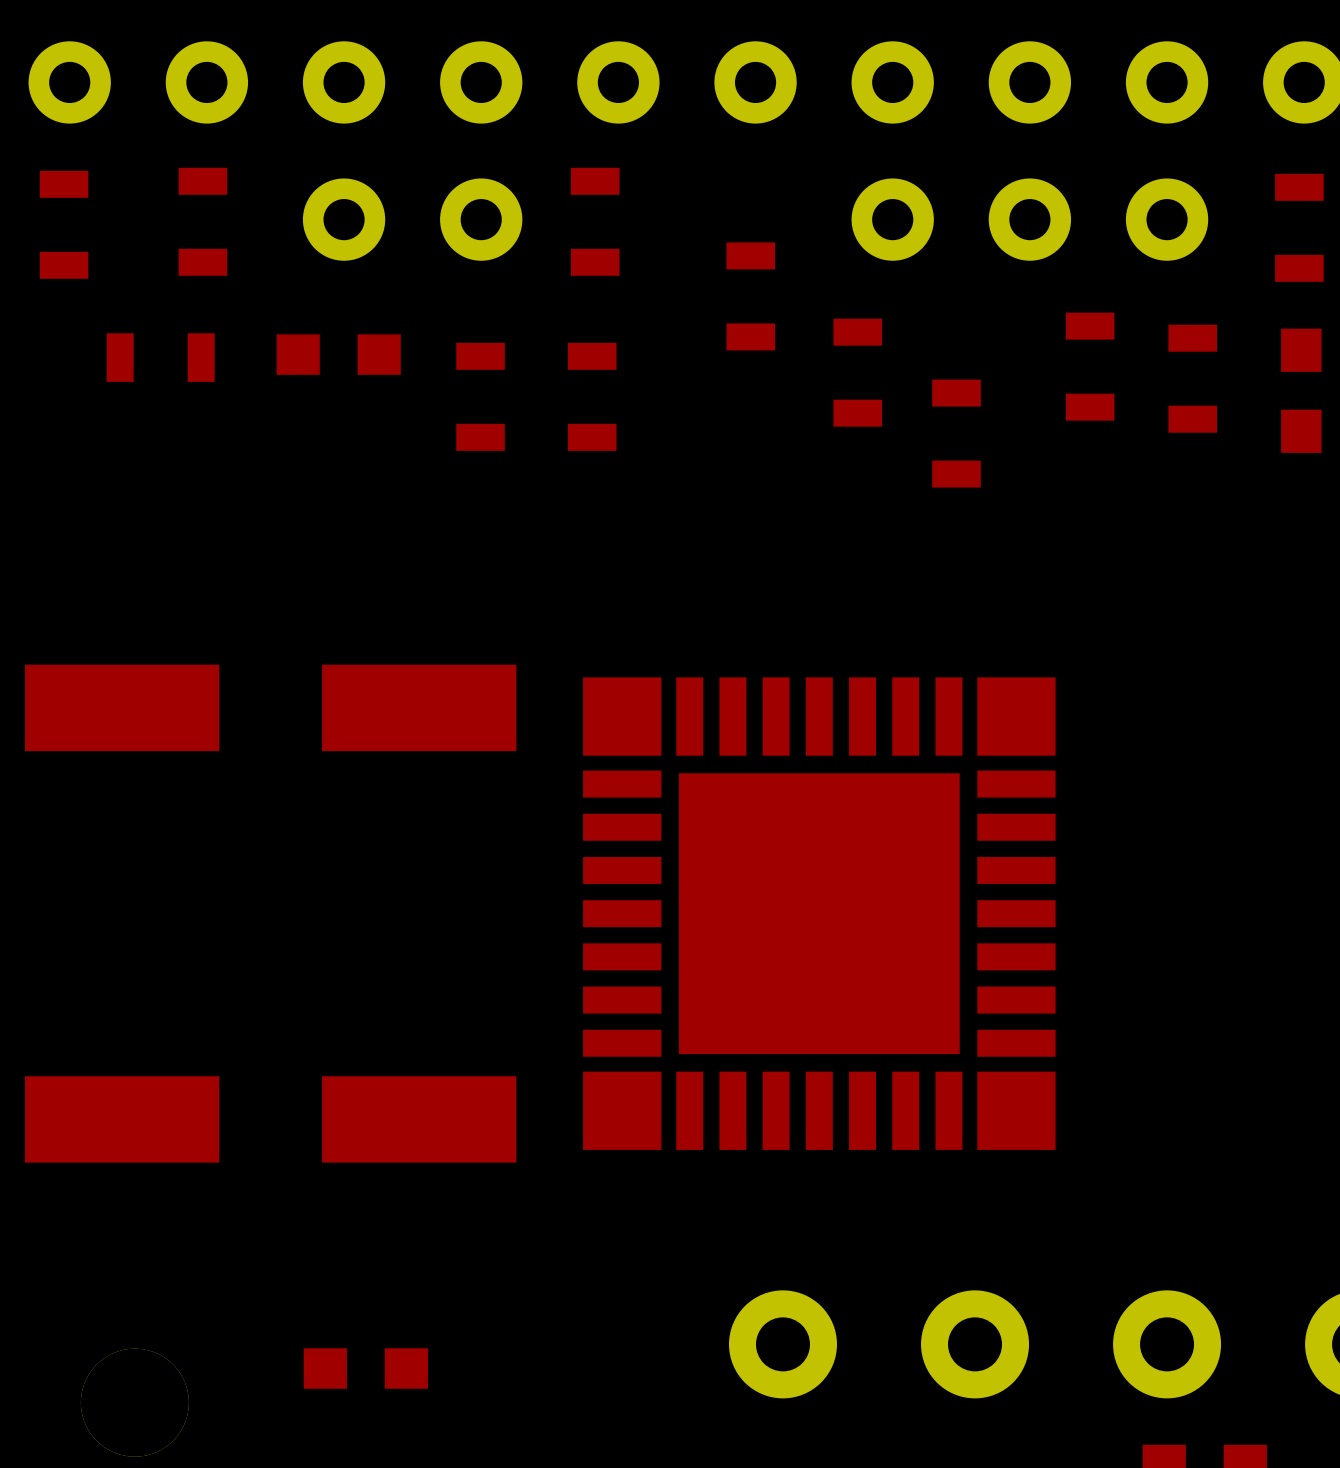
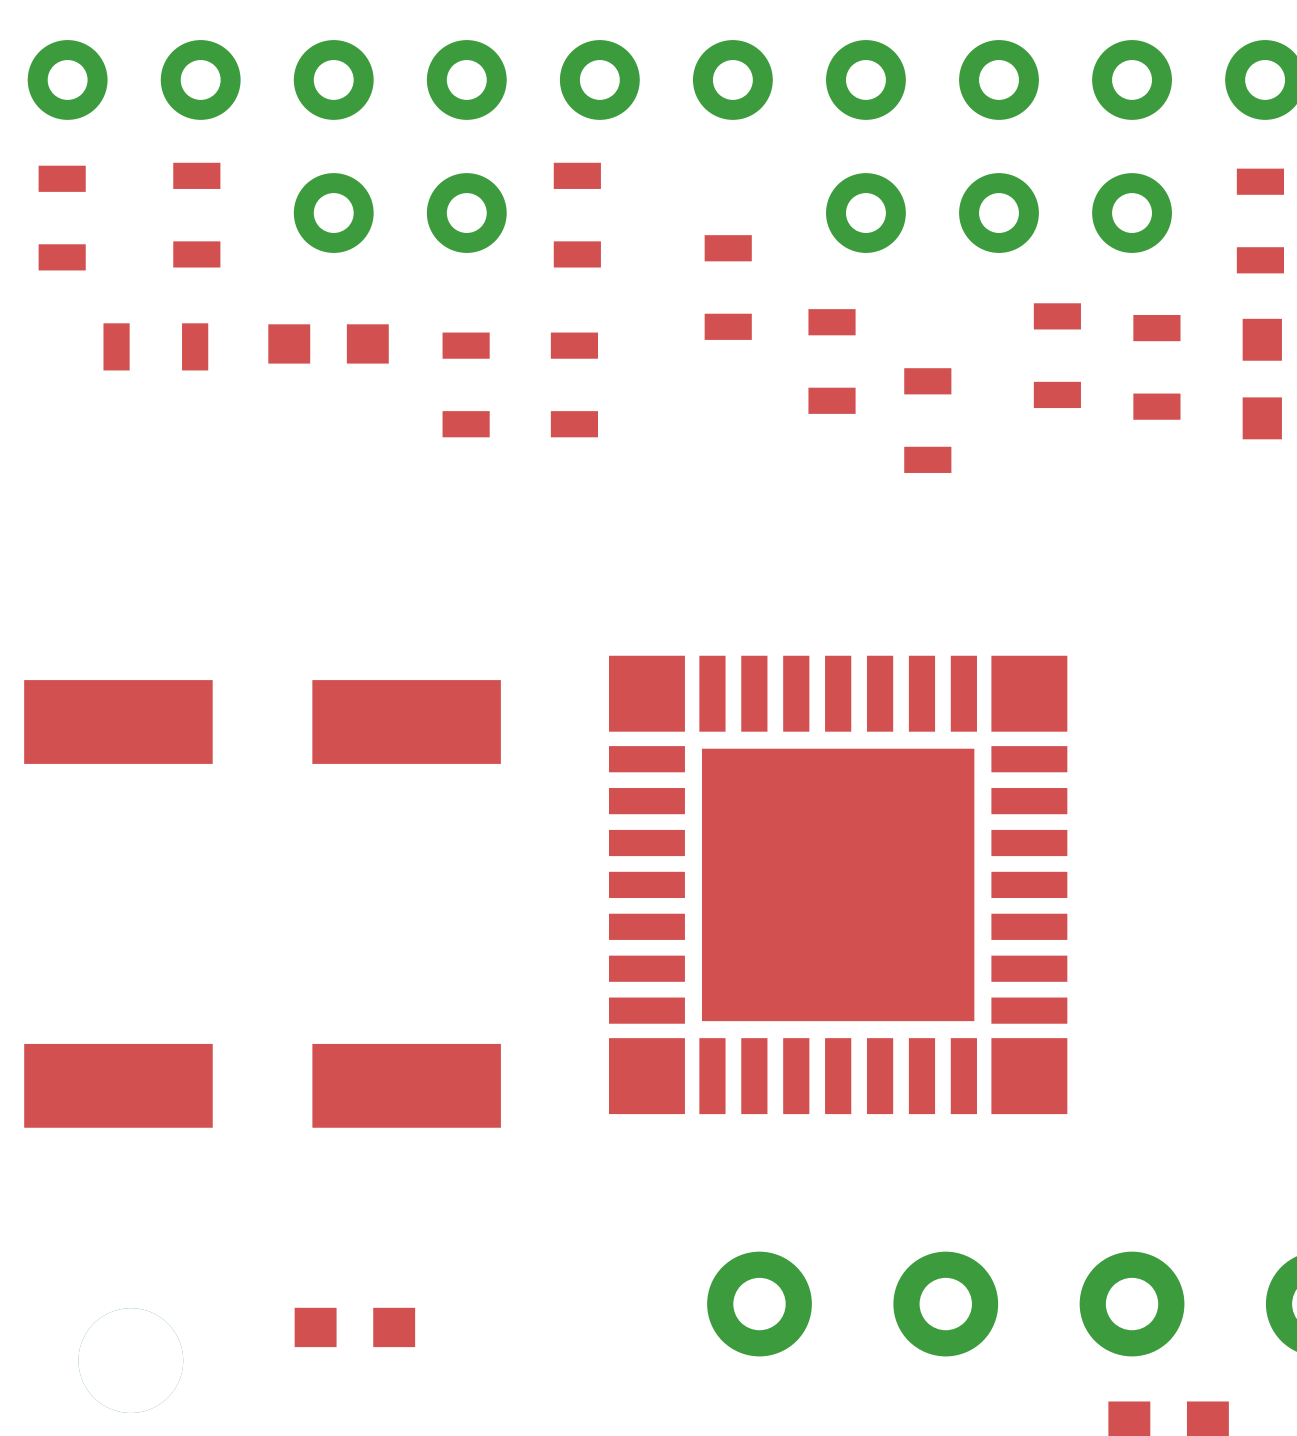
part position: (270, 707) -> (262, 722)
part position: (819, 913) -> (838, 884)

